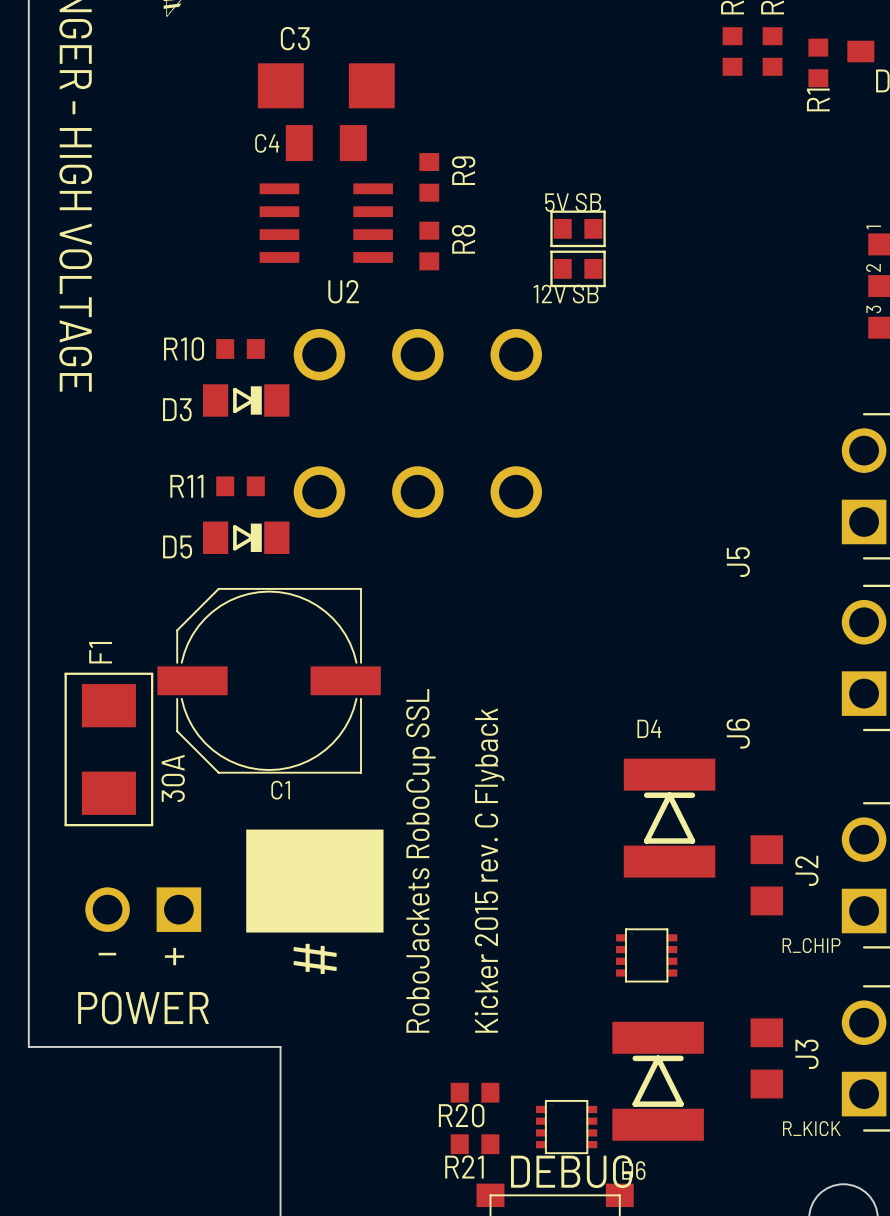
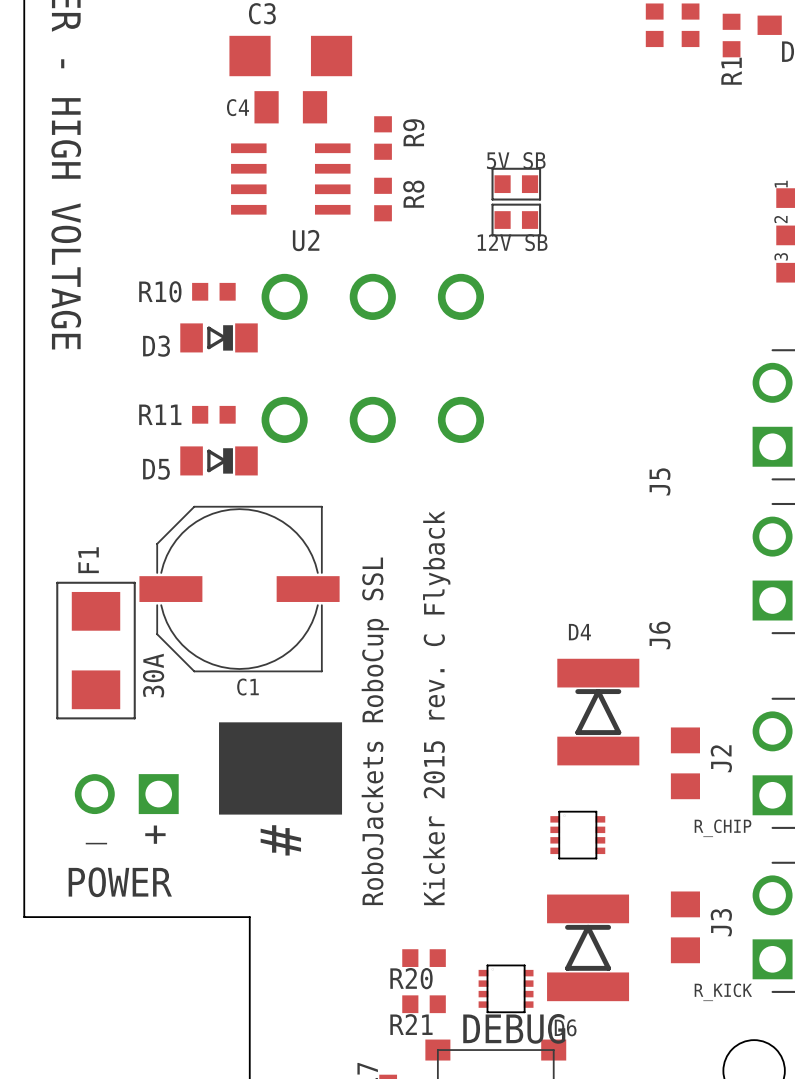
part footprint: [616, 929, 678, 982] -> [550, 811, 606, 859]
part footprint: [535, 1100, 598, 1154] -> [478, 965, 534, 1013]

